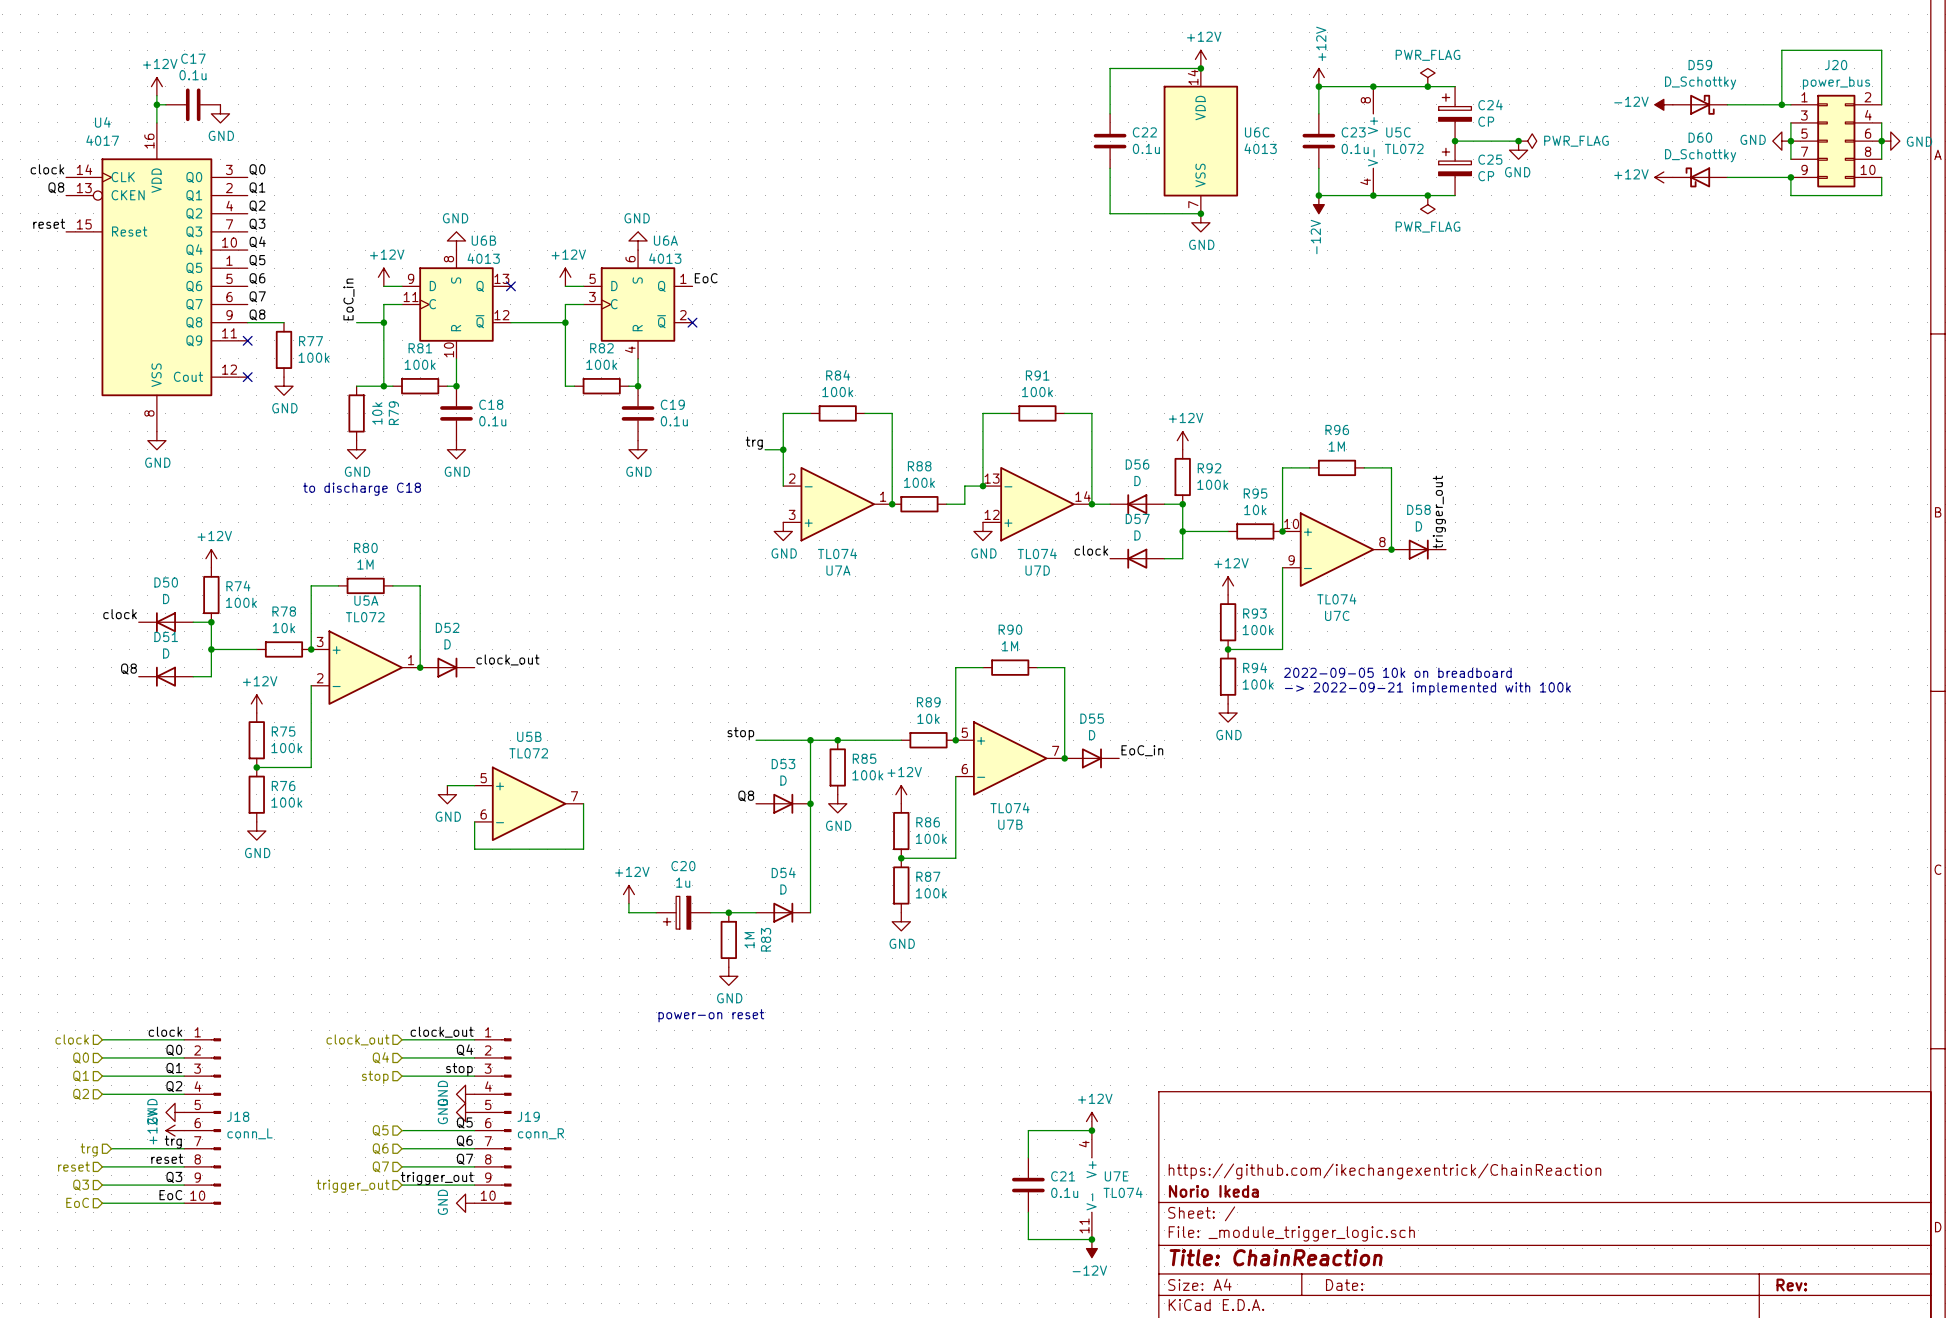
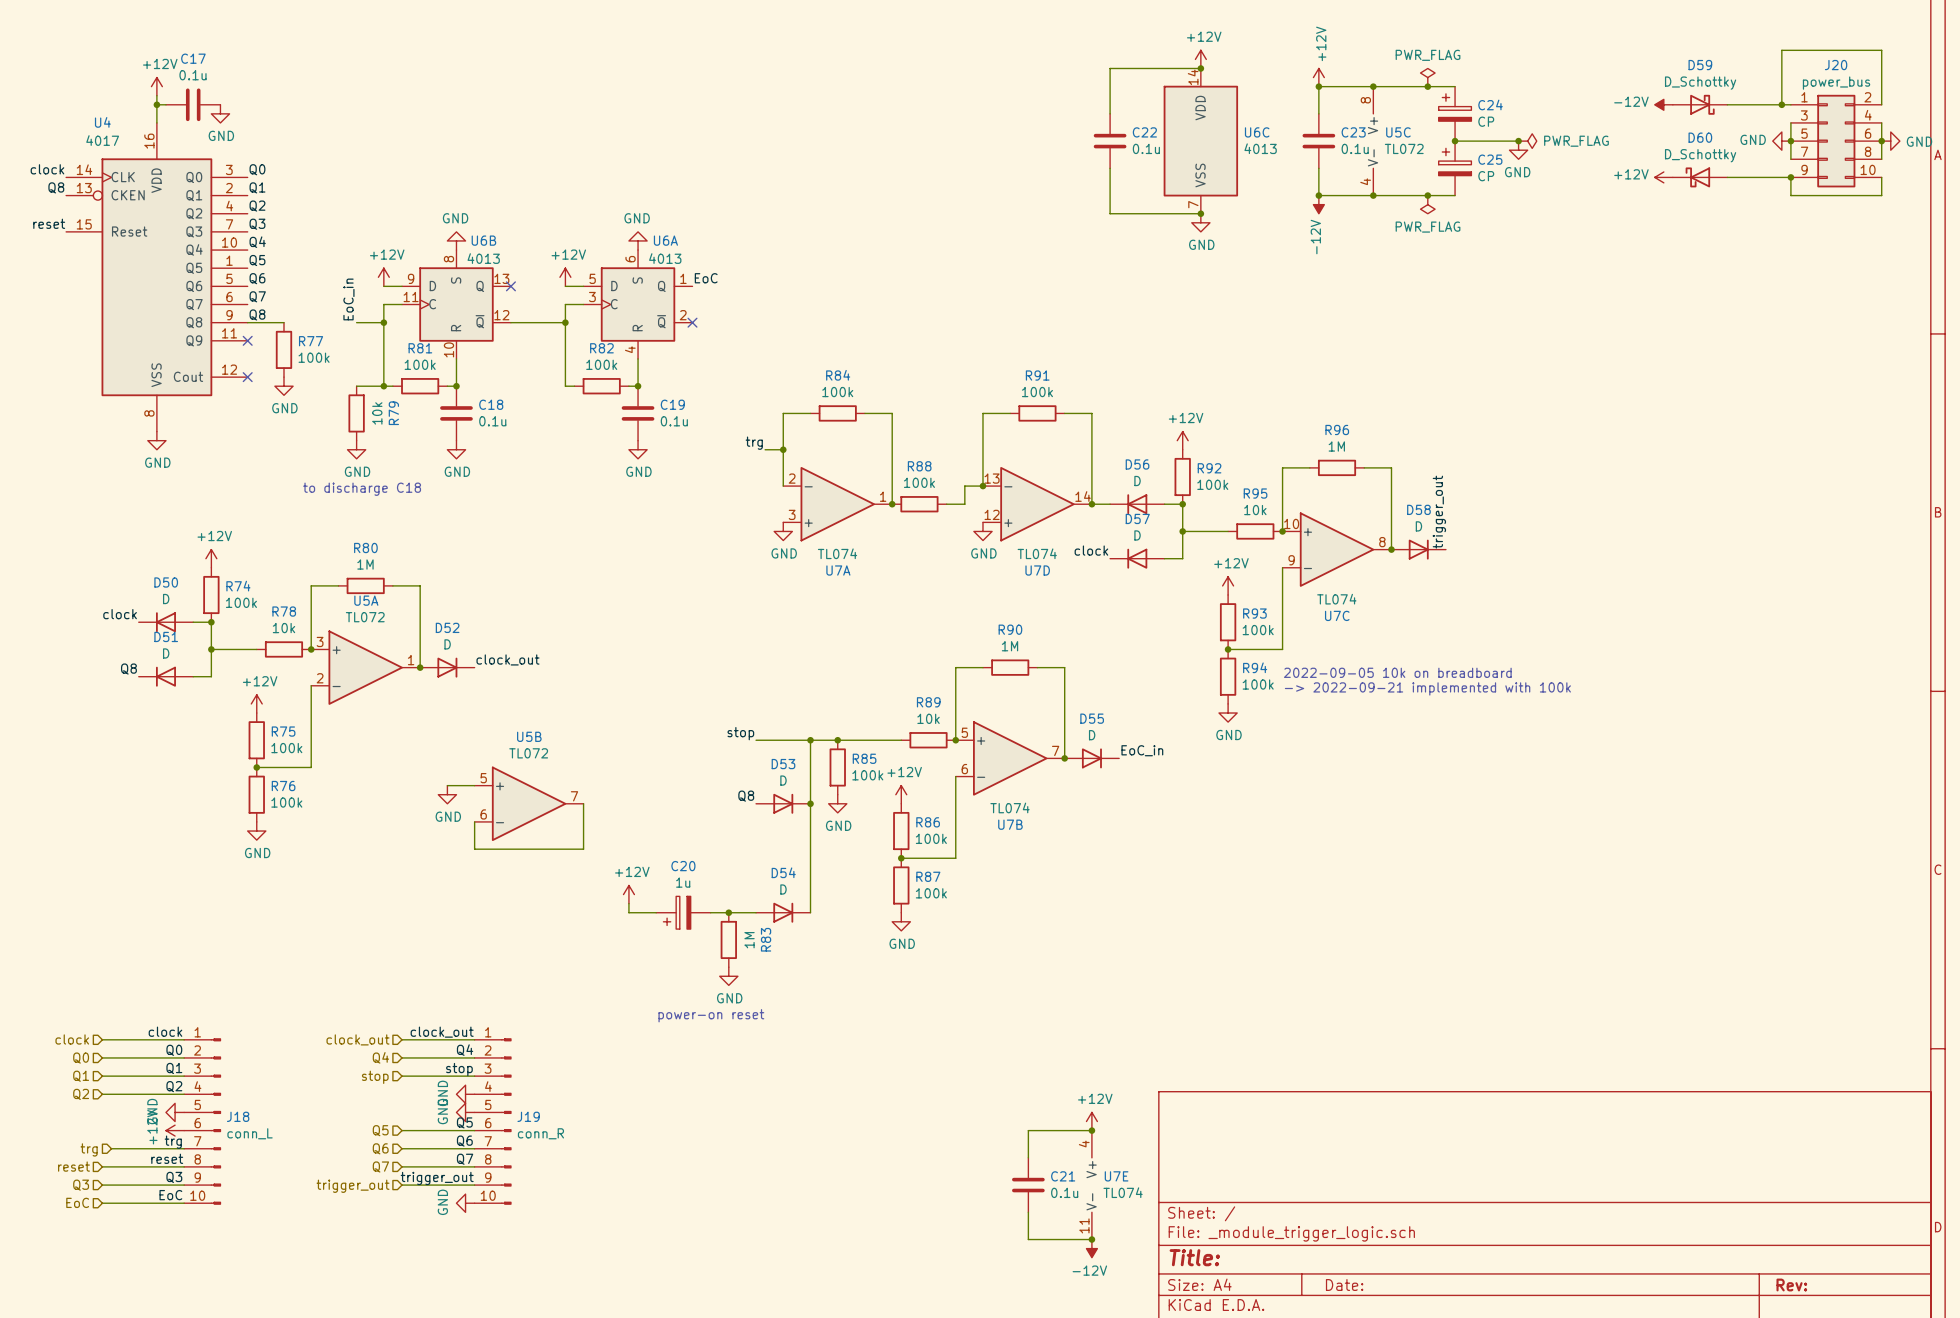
title block: https://github.com/ikechangexentrick/ChainReaction (1384, 1171) -> none
title block: Norio Ikeda (1213, 1191) -> none
title block: Title: ChainReaction (1276, 1257) -> Title: (1194, 1257)

